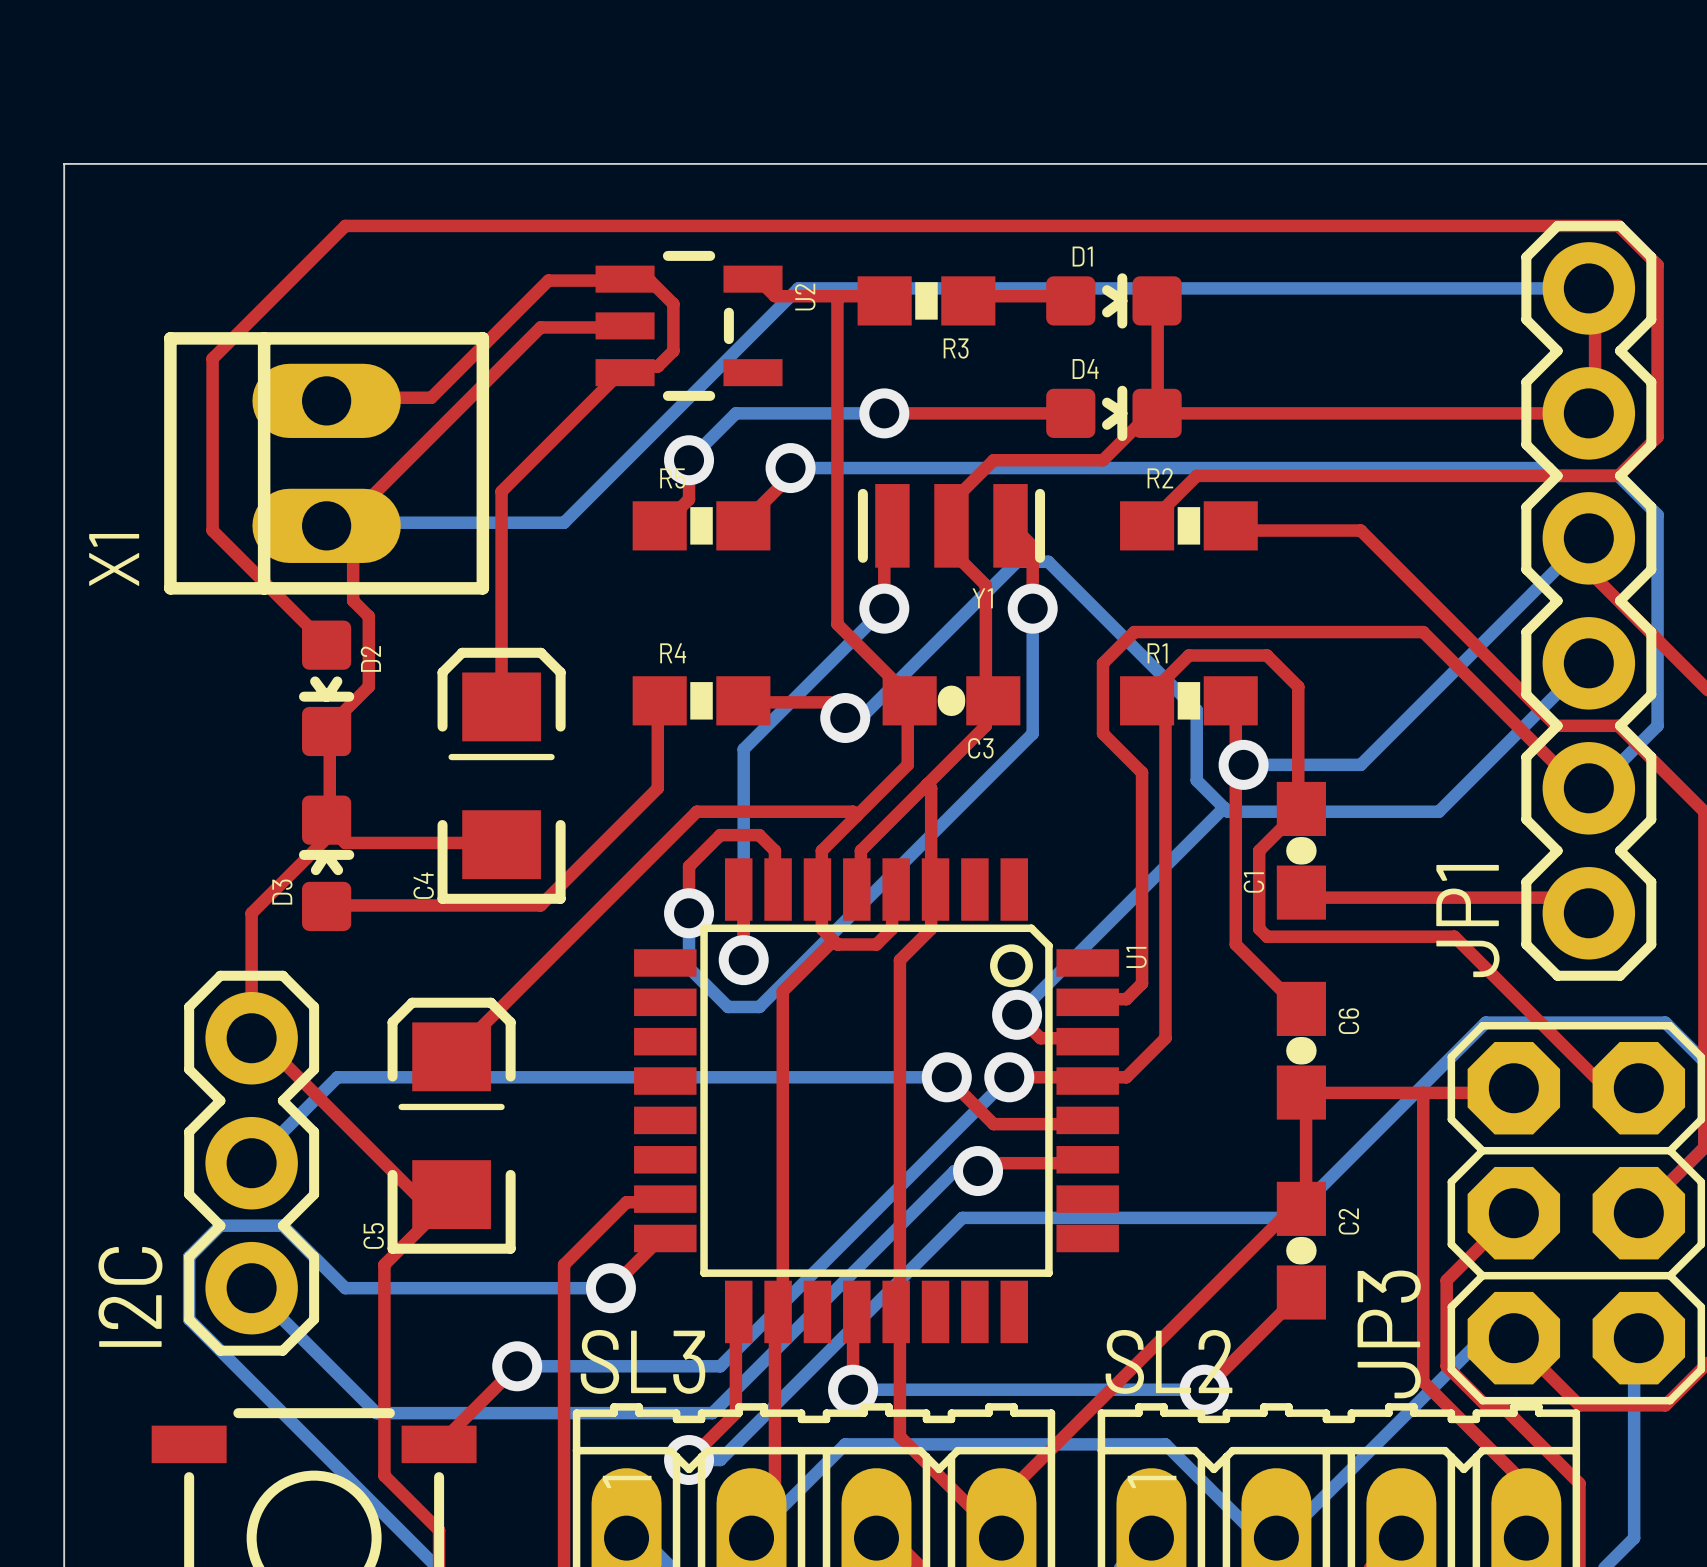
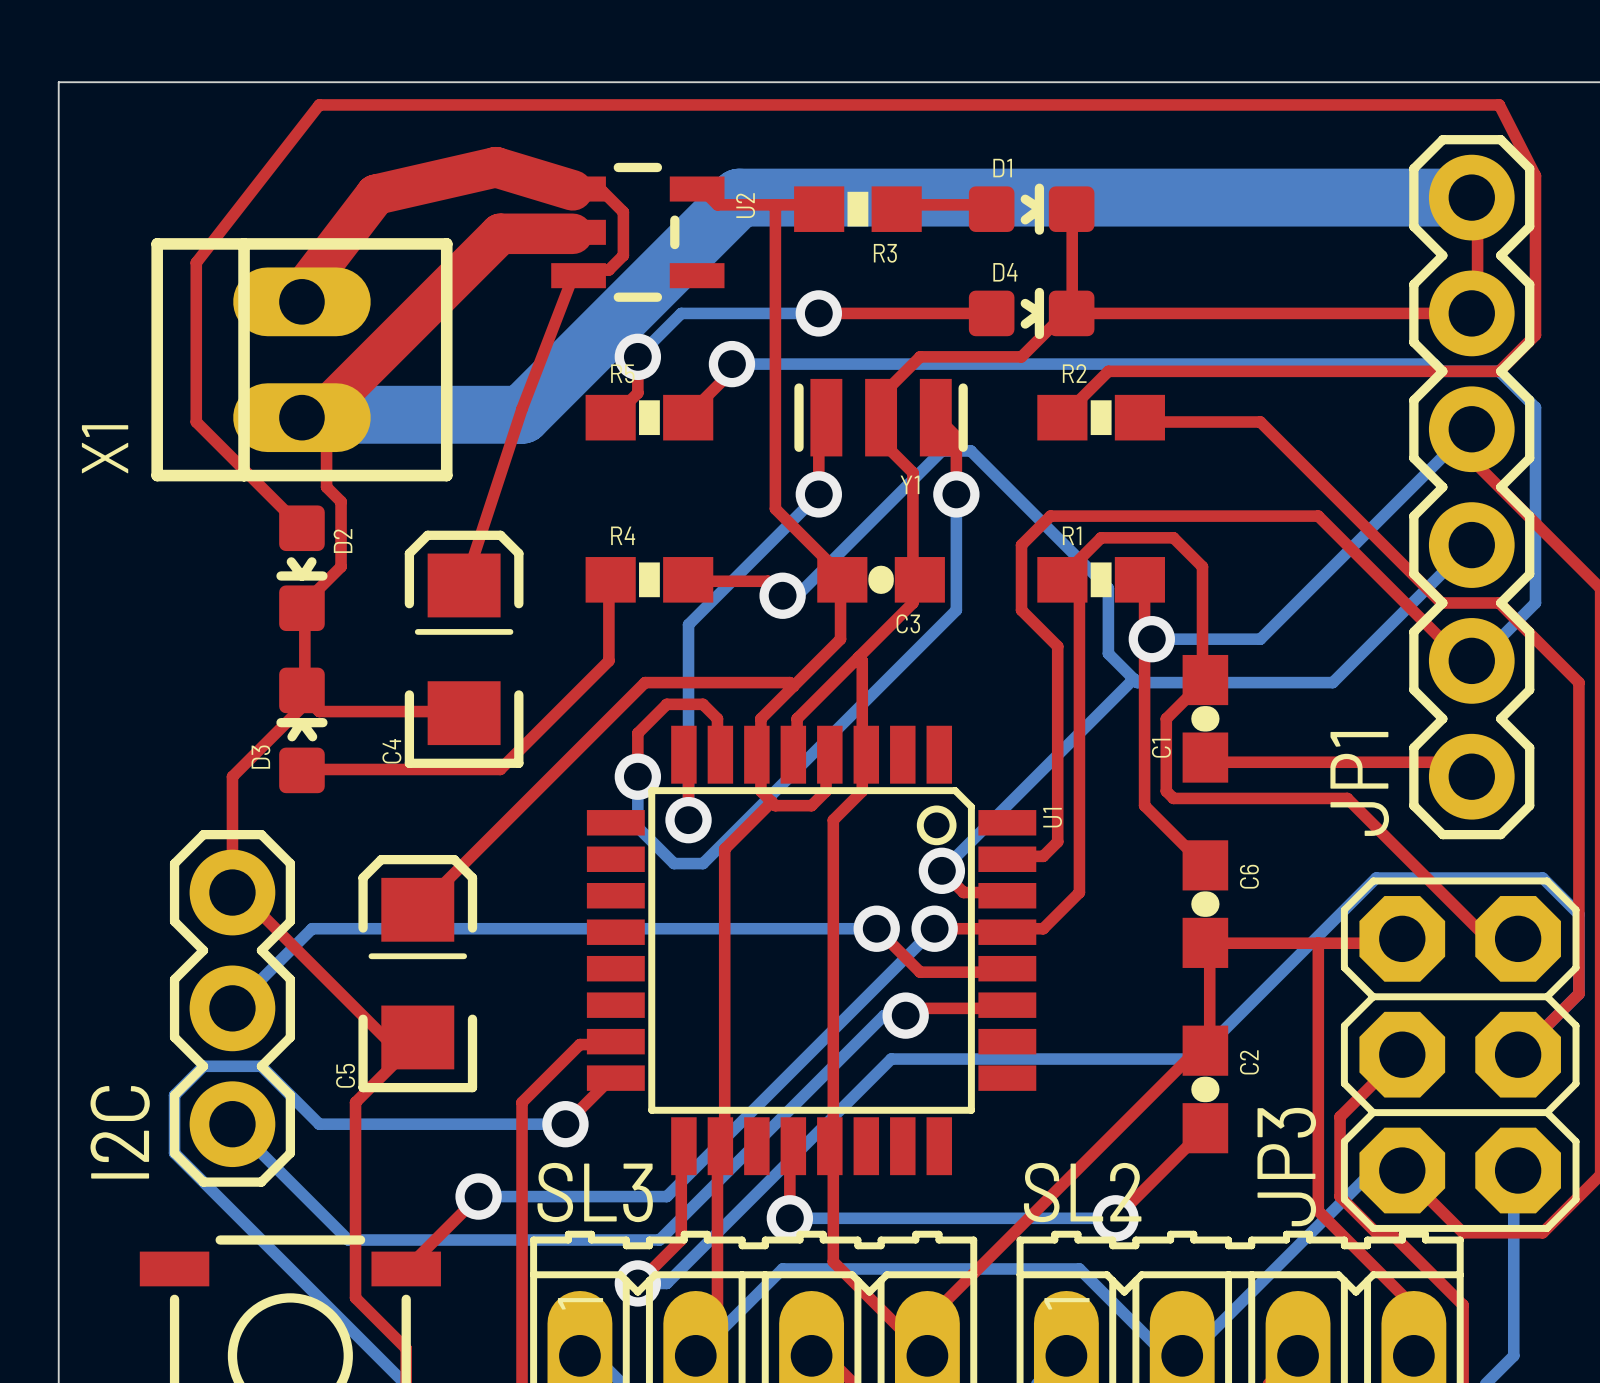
top track: (1657, 264) (1618, 225) (345, 225) (212, 358) -> (1535, 175) (1499, 104) (319, 104) (196, 262)
top track: (618, 280) (548, 280) (431, 397) (329, 397) (326, 400) -> (572, 190) (495, 167) (375, 194) (304, 287) (301, 301)
bottom track width: thin (1588, 288) (798, 288) (564, 522) (329, 522) -> thick (1471, 197) (739, 197) (522, 414) (304, 414)
top track width: thin (618, 327) (540, 327) (345, 522) -> thick (572, 233) (500, 233) (319, 414)
top track: (618, 374) (501, 491) (501, 706) -> (572, 277) (522, 408) (464, 585)

